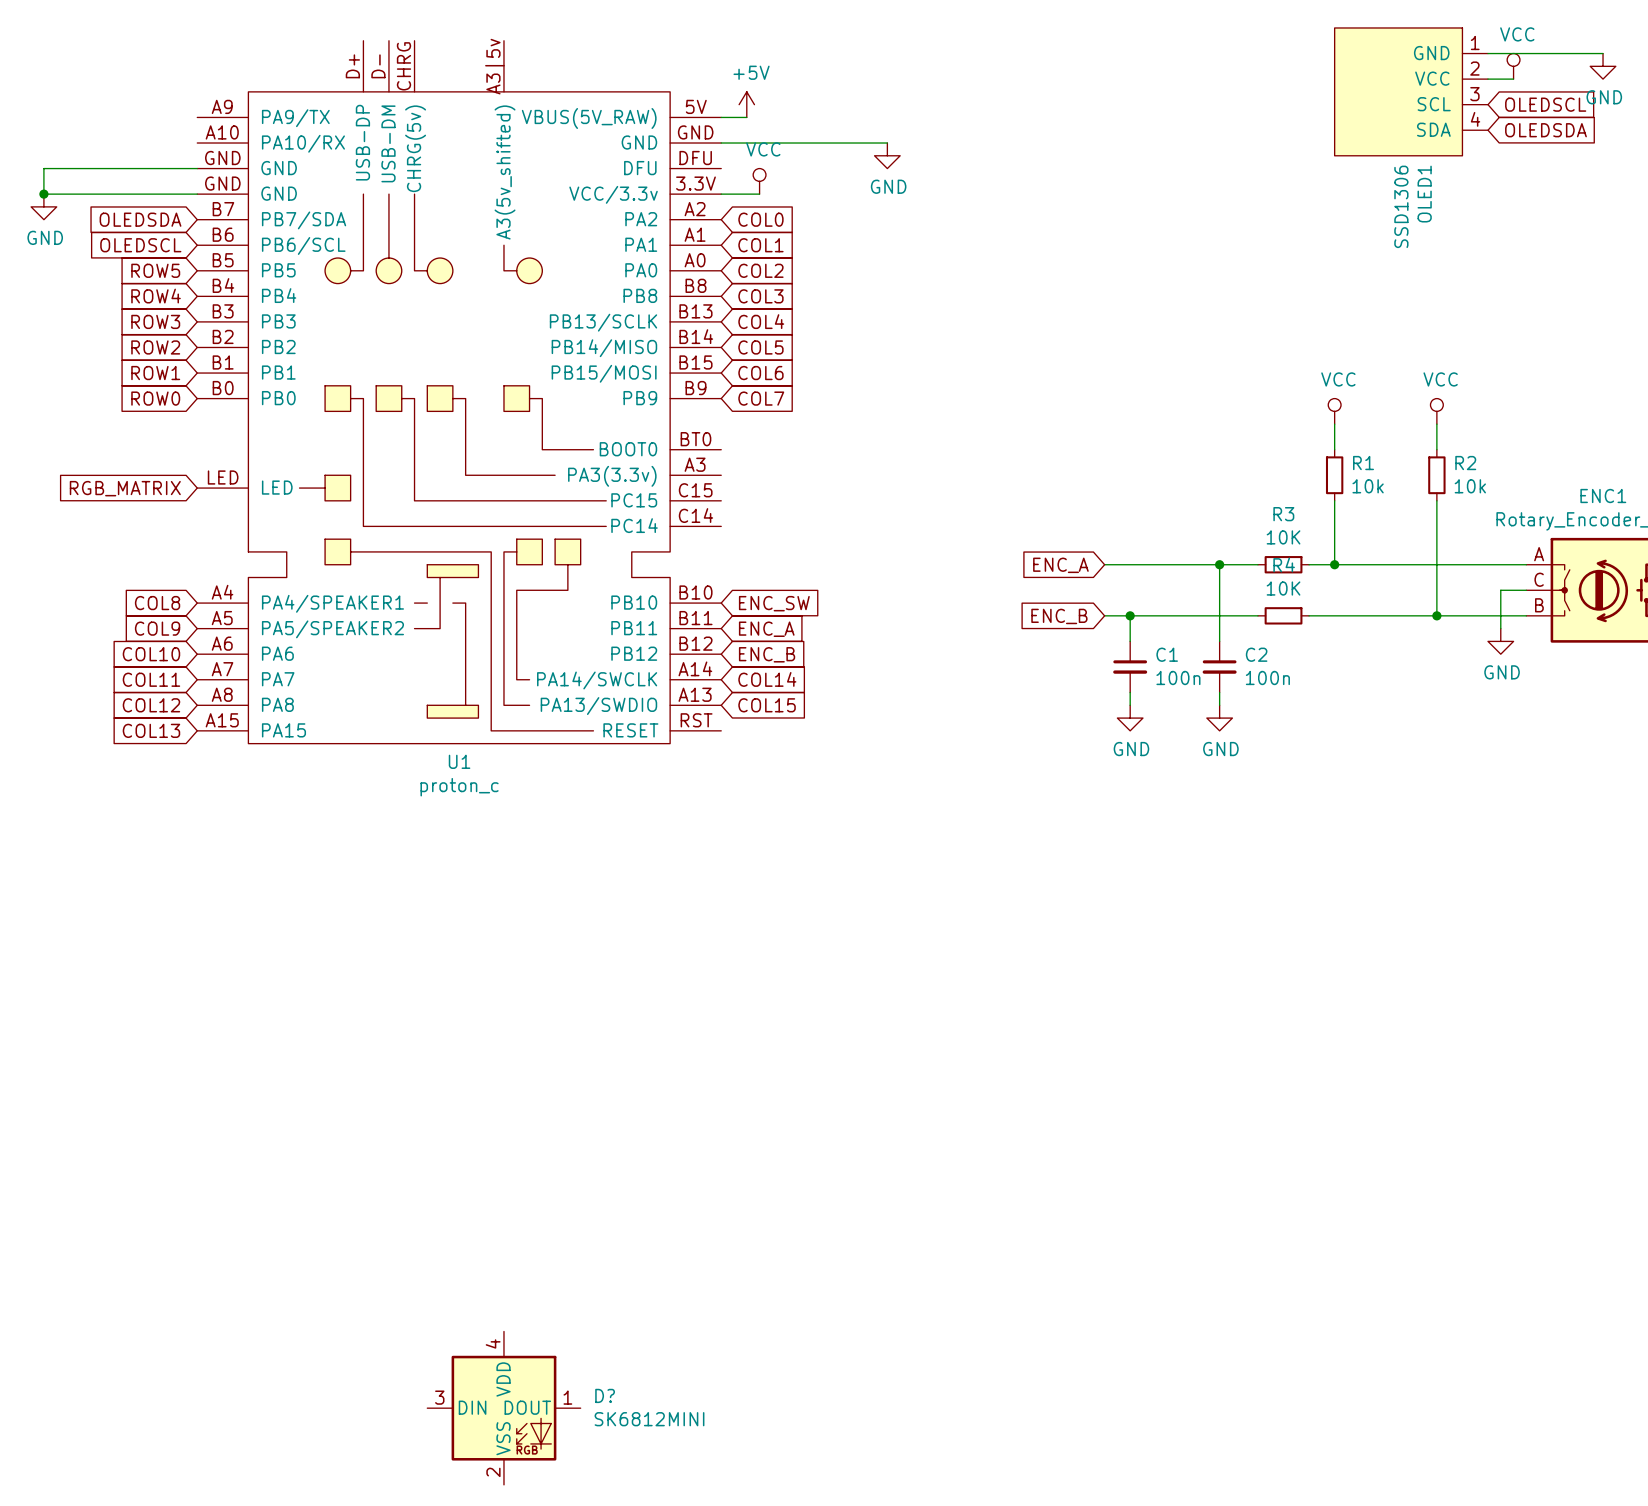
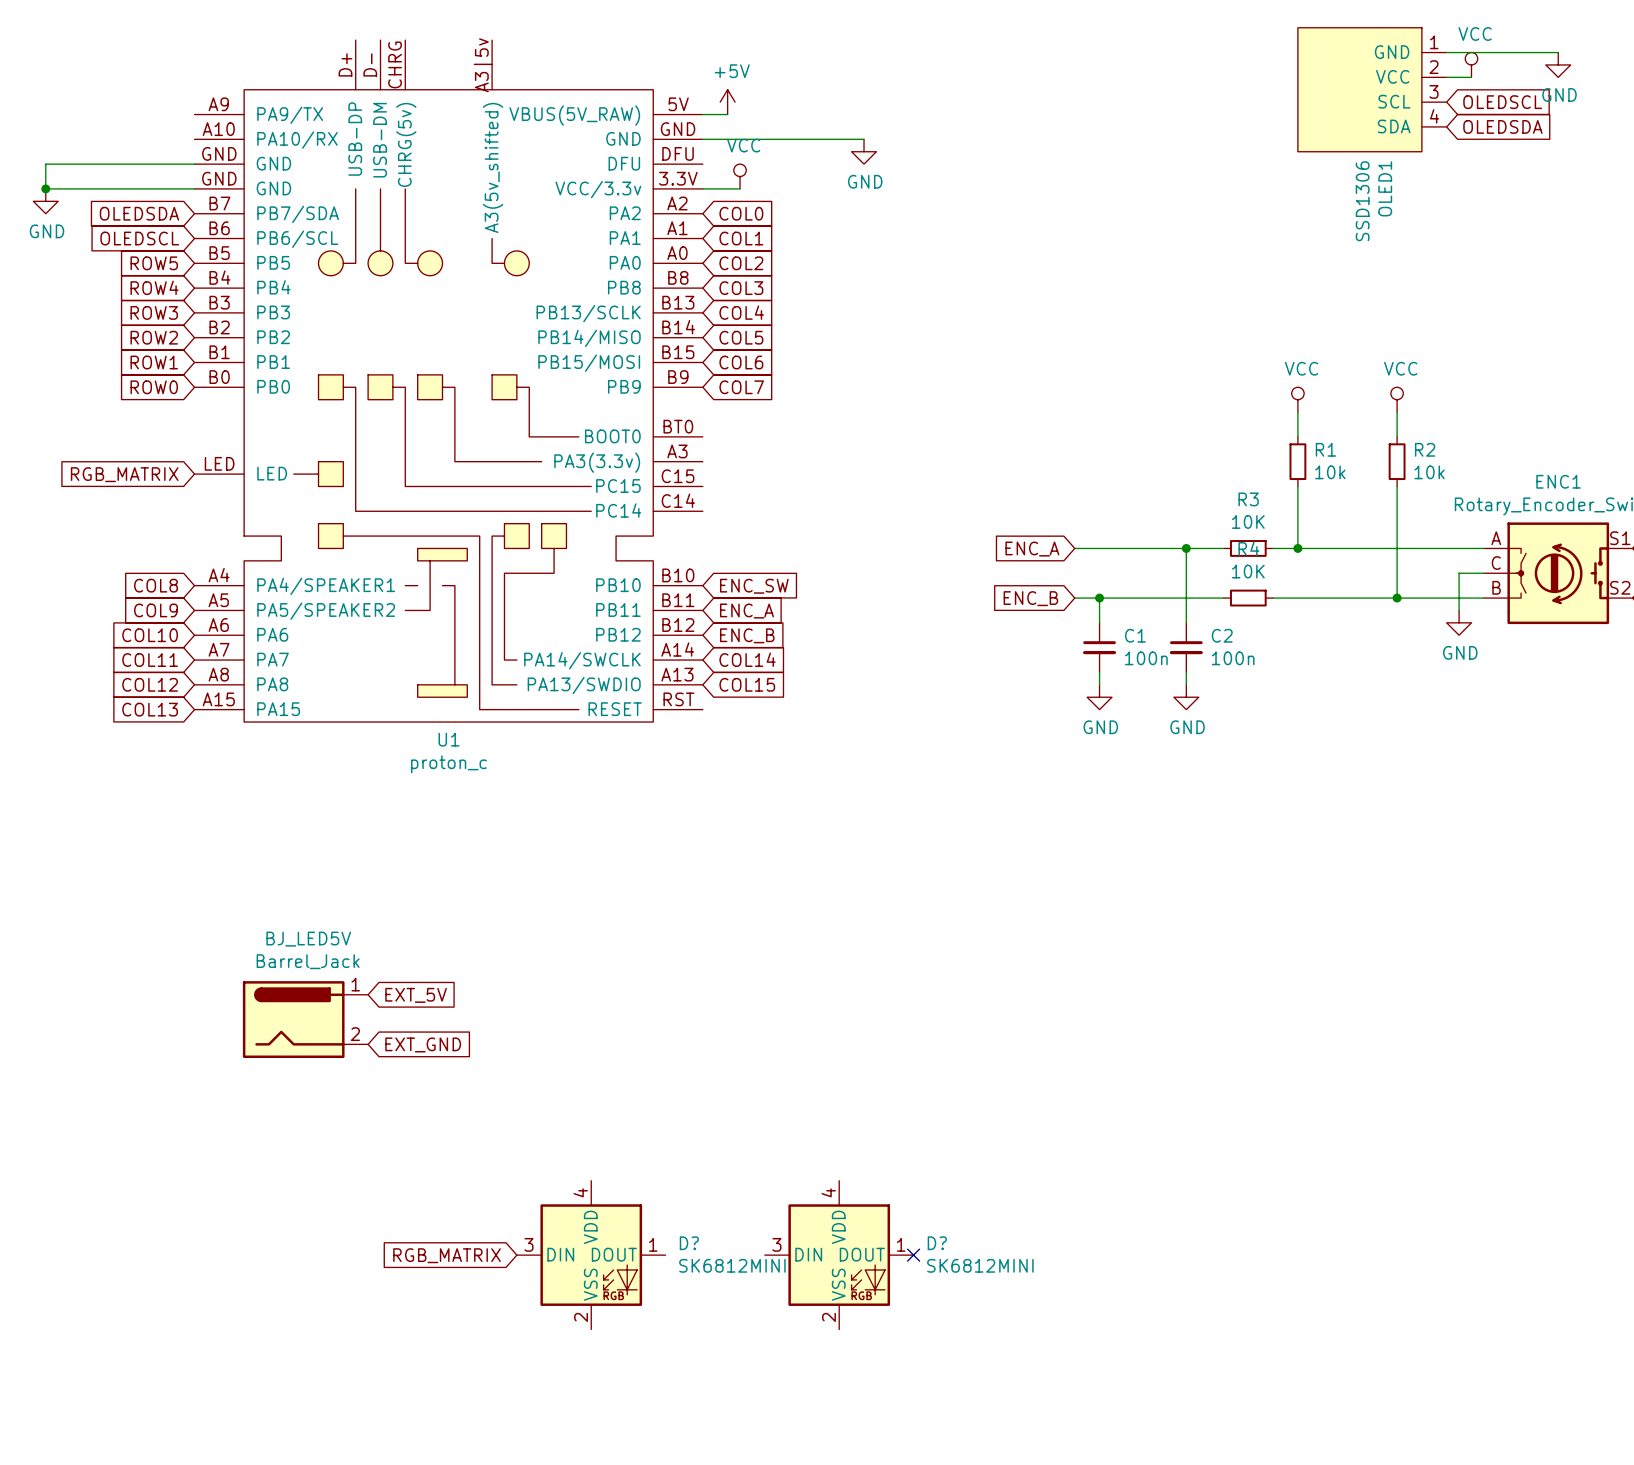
global label: none -> EXT_5V (416, 995)
BJ_LED5V: none -> Barrel_Jack (305, 1019)
global label: none -> EXT_GND (423, 1044)
global label: none -> RGB_MATRIX (447, 1255)
D?: none -> SK6812MINI (839, 1255)
no-connect mark: none -> (913, 1255)
D? position: (503, 1408) -> (591, 1255)

